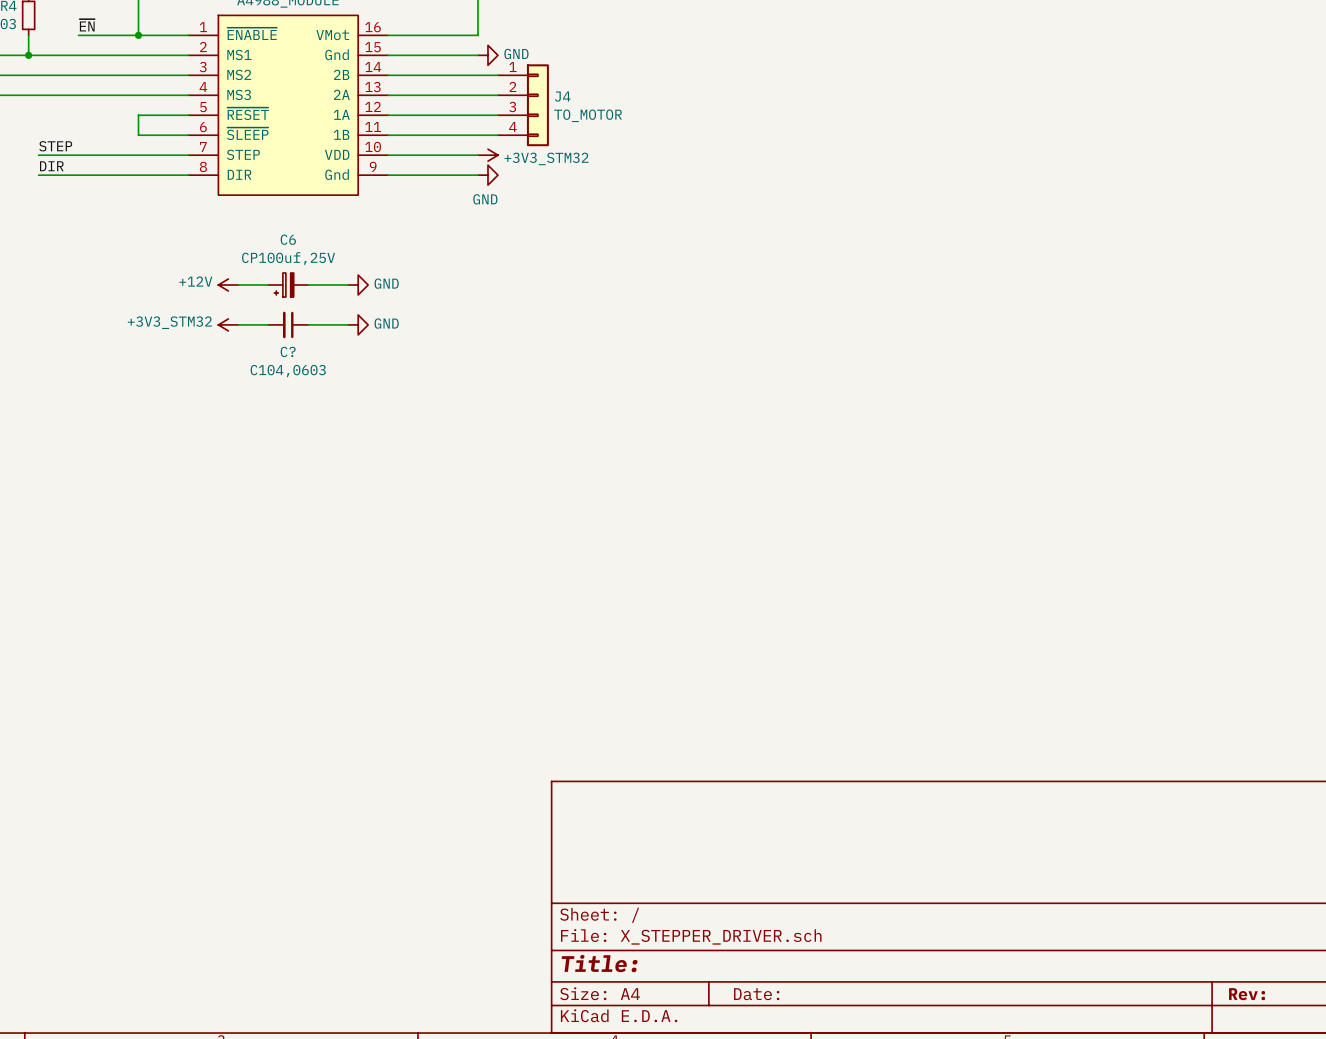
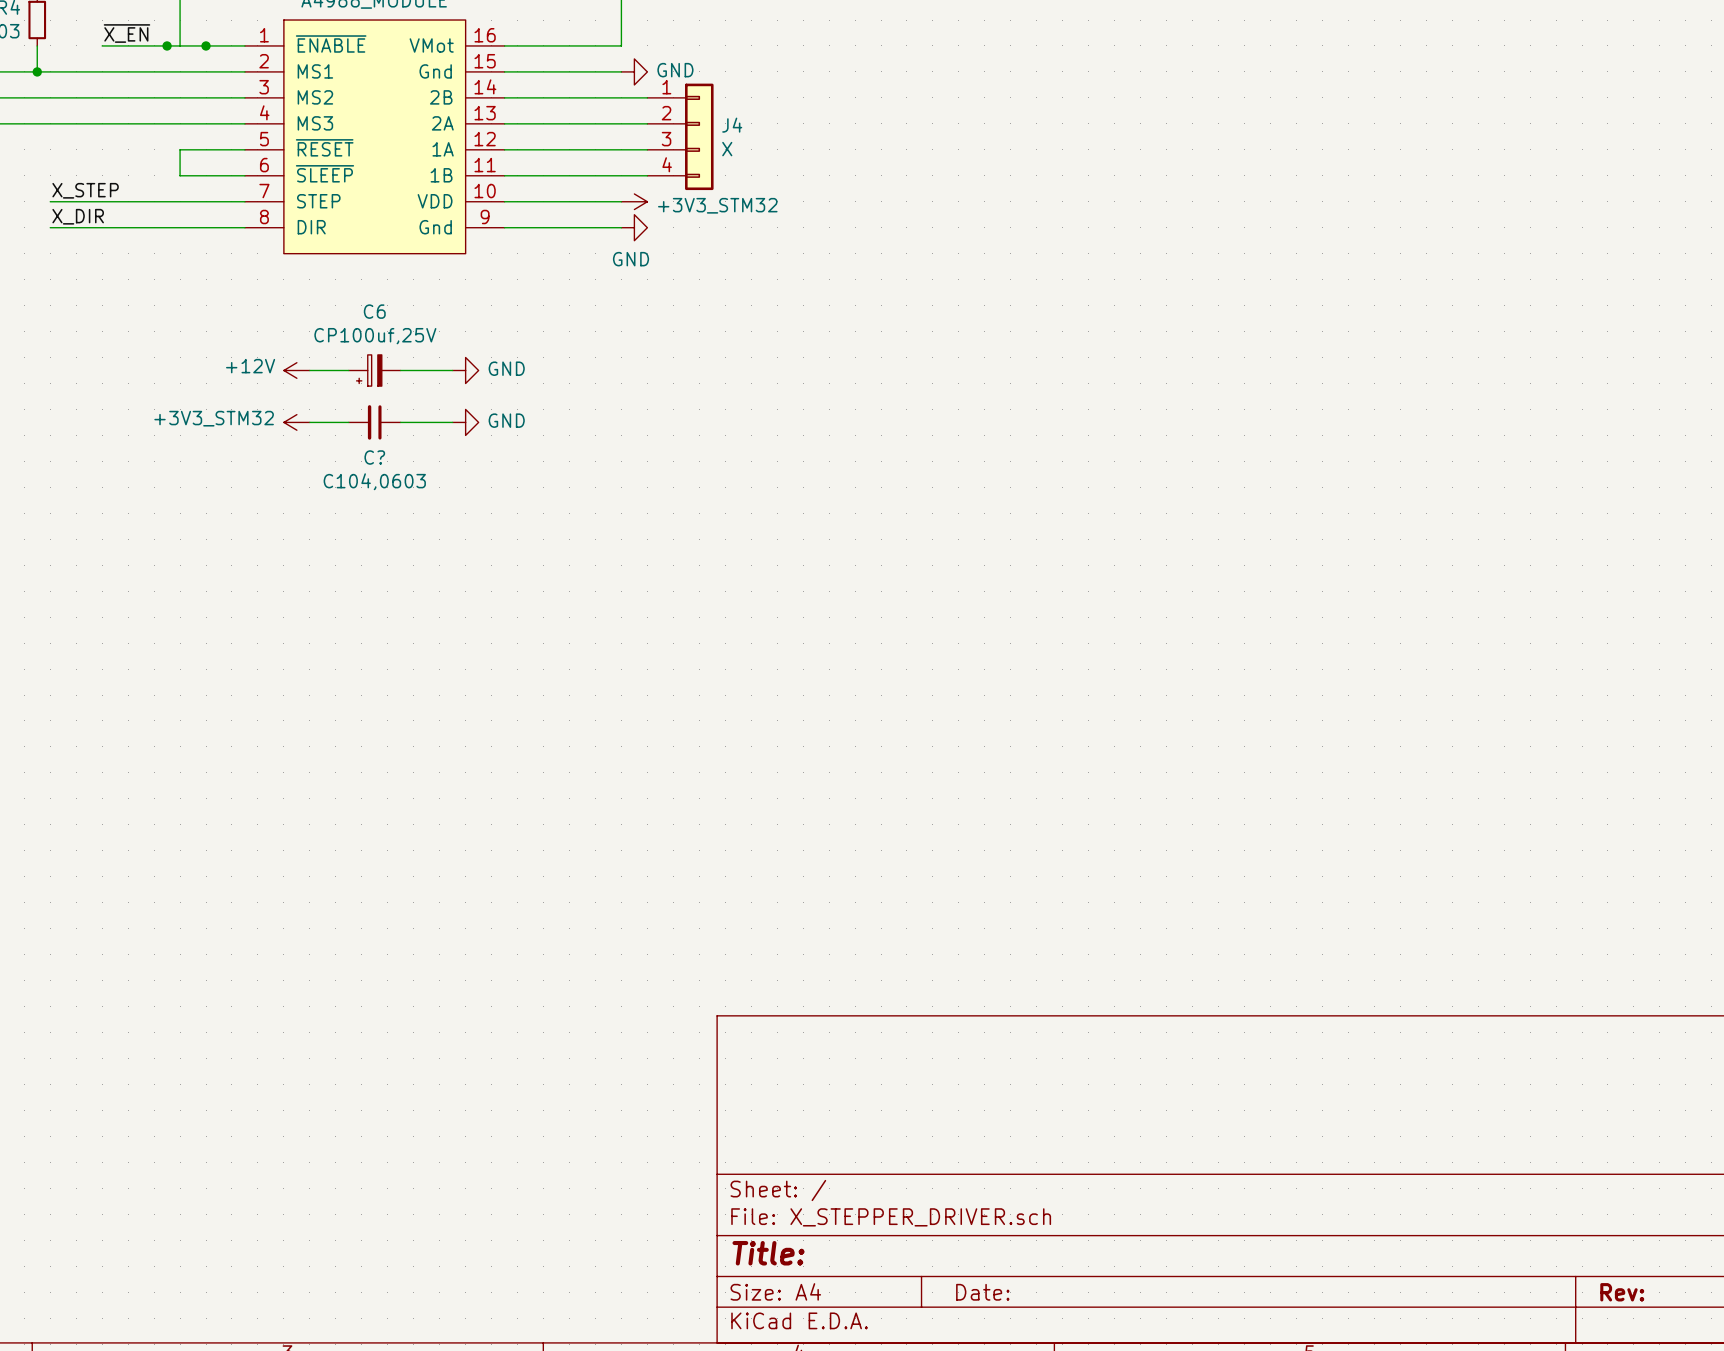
label: ~{EN} (87, 25) -> ~{X_EN} (126, 33)
junction: none -> (167, 45)
junction: (138, 35) -> none
junction: none -> (206, 45)
J4 value: TO_MOTOR (588, 115) -> X (727, 149)
label: STEP (55, 146) -> X_STEP (85, 190)
label: DIR (51, 166) -> X_DIR (78, 216)

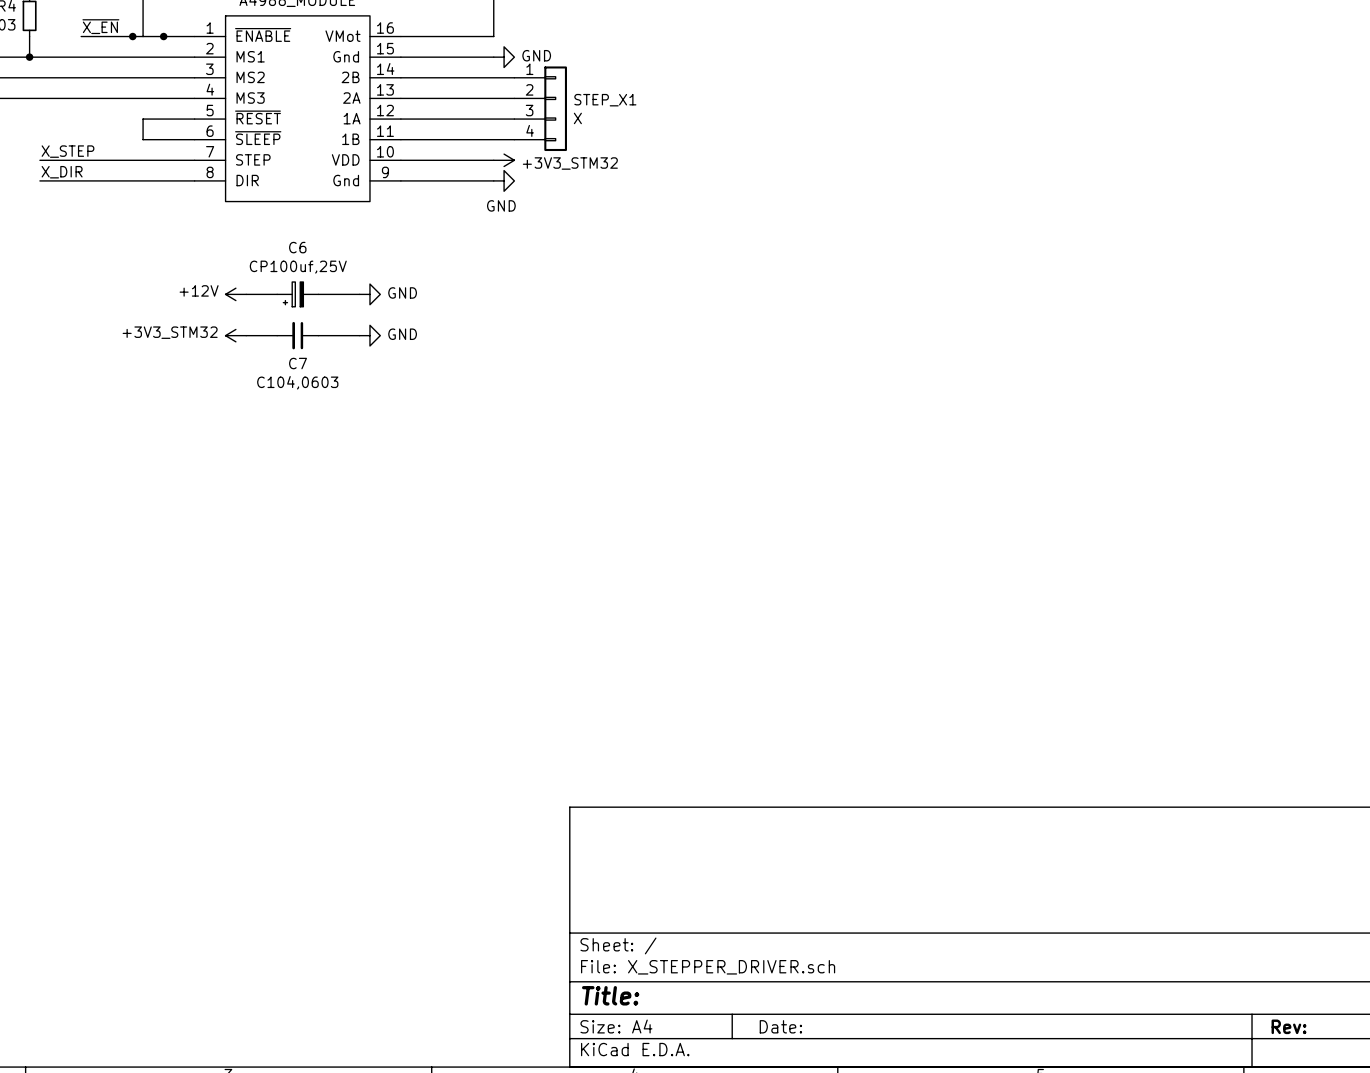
J4 name: J4 (732, 125) -> STEP_X1 (605, 100)
C? name: C? (374, 457) -> C7 (298, 363)

